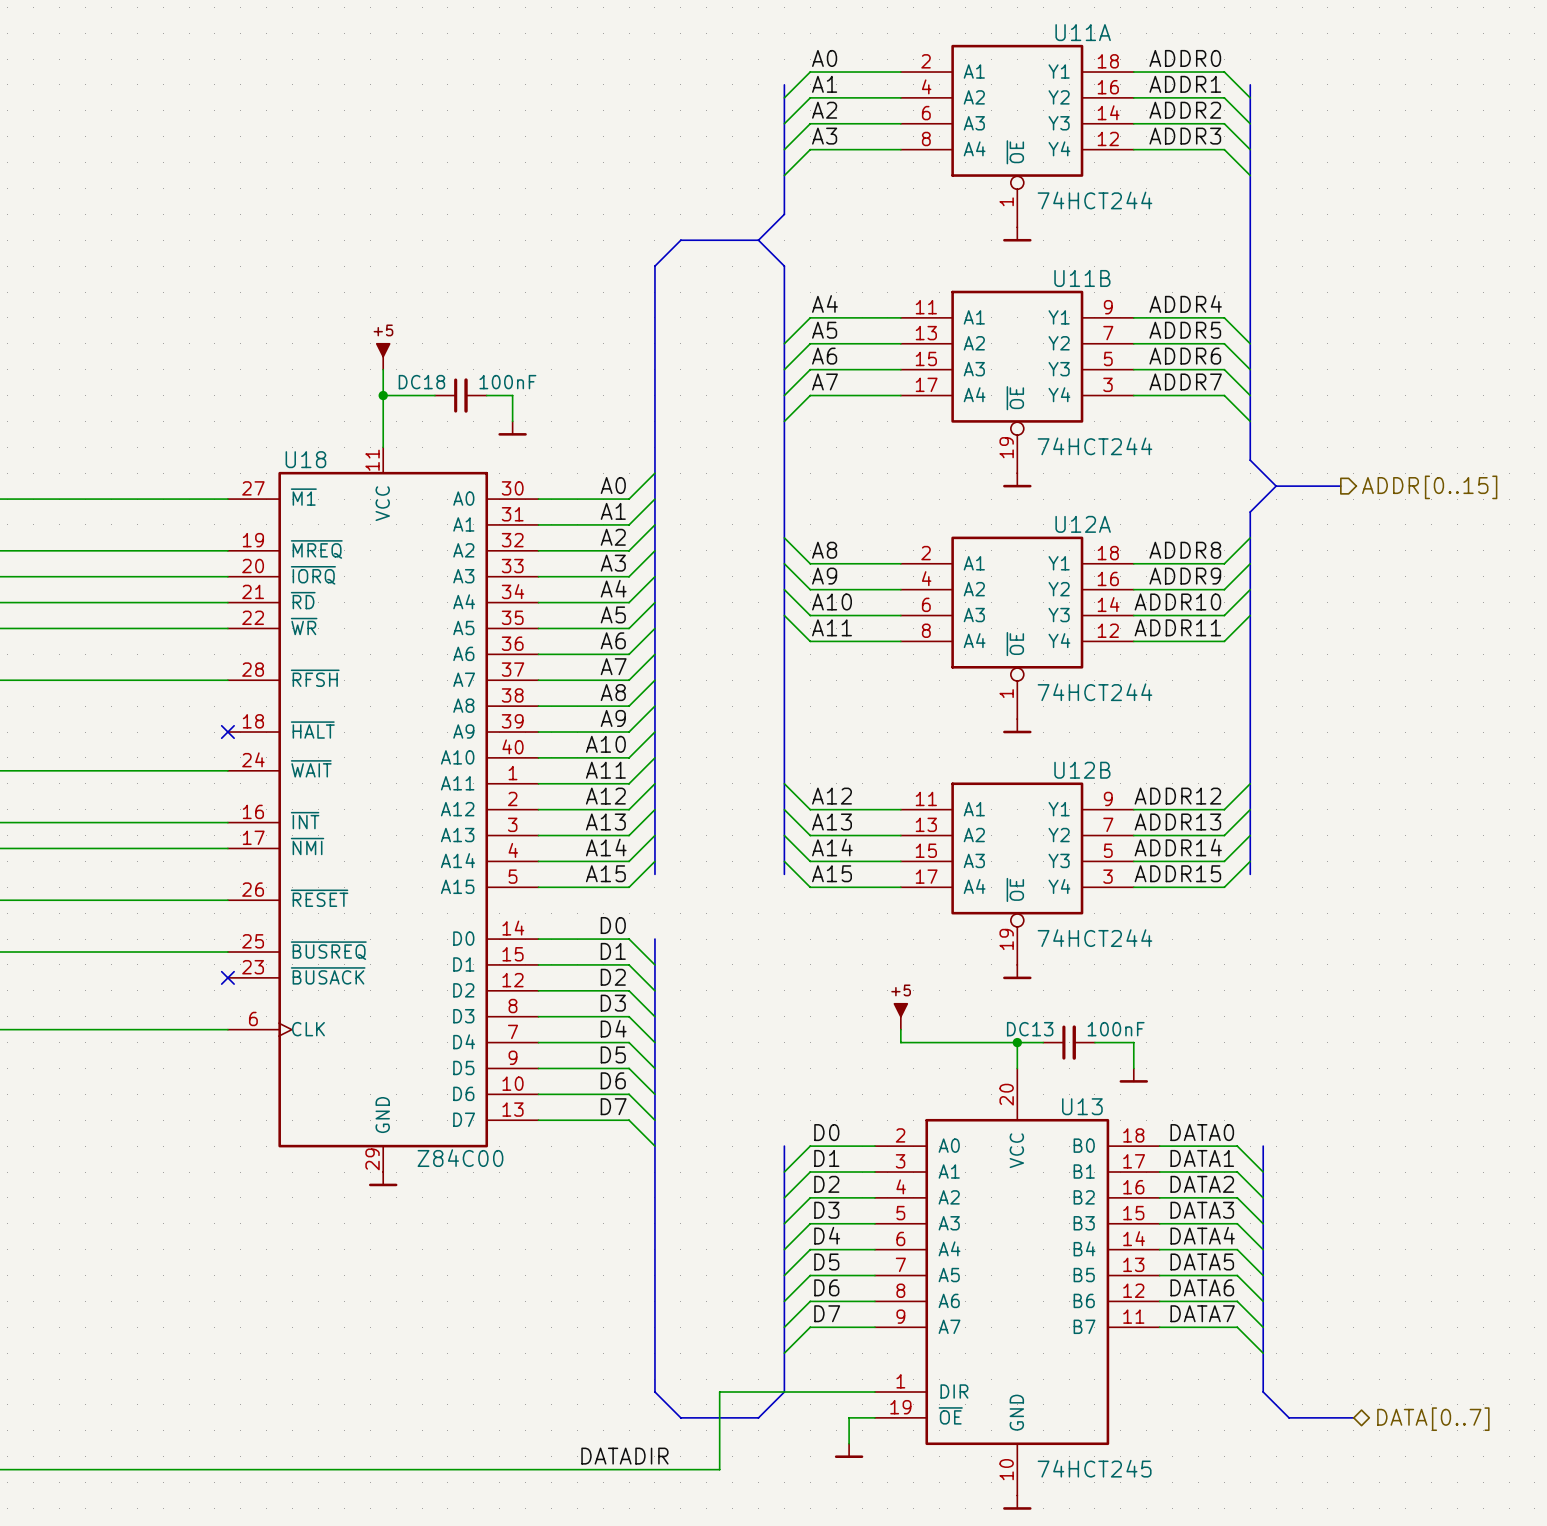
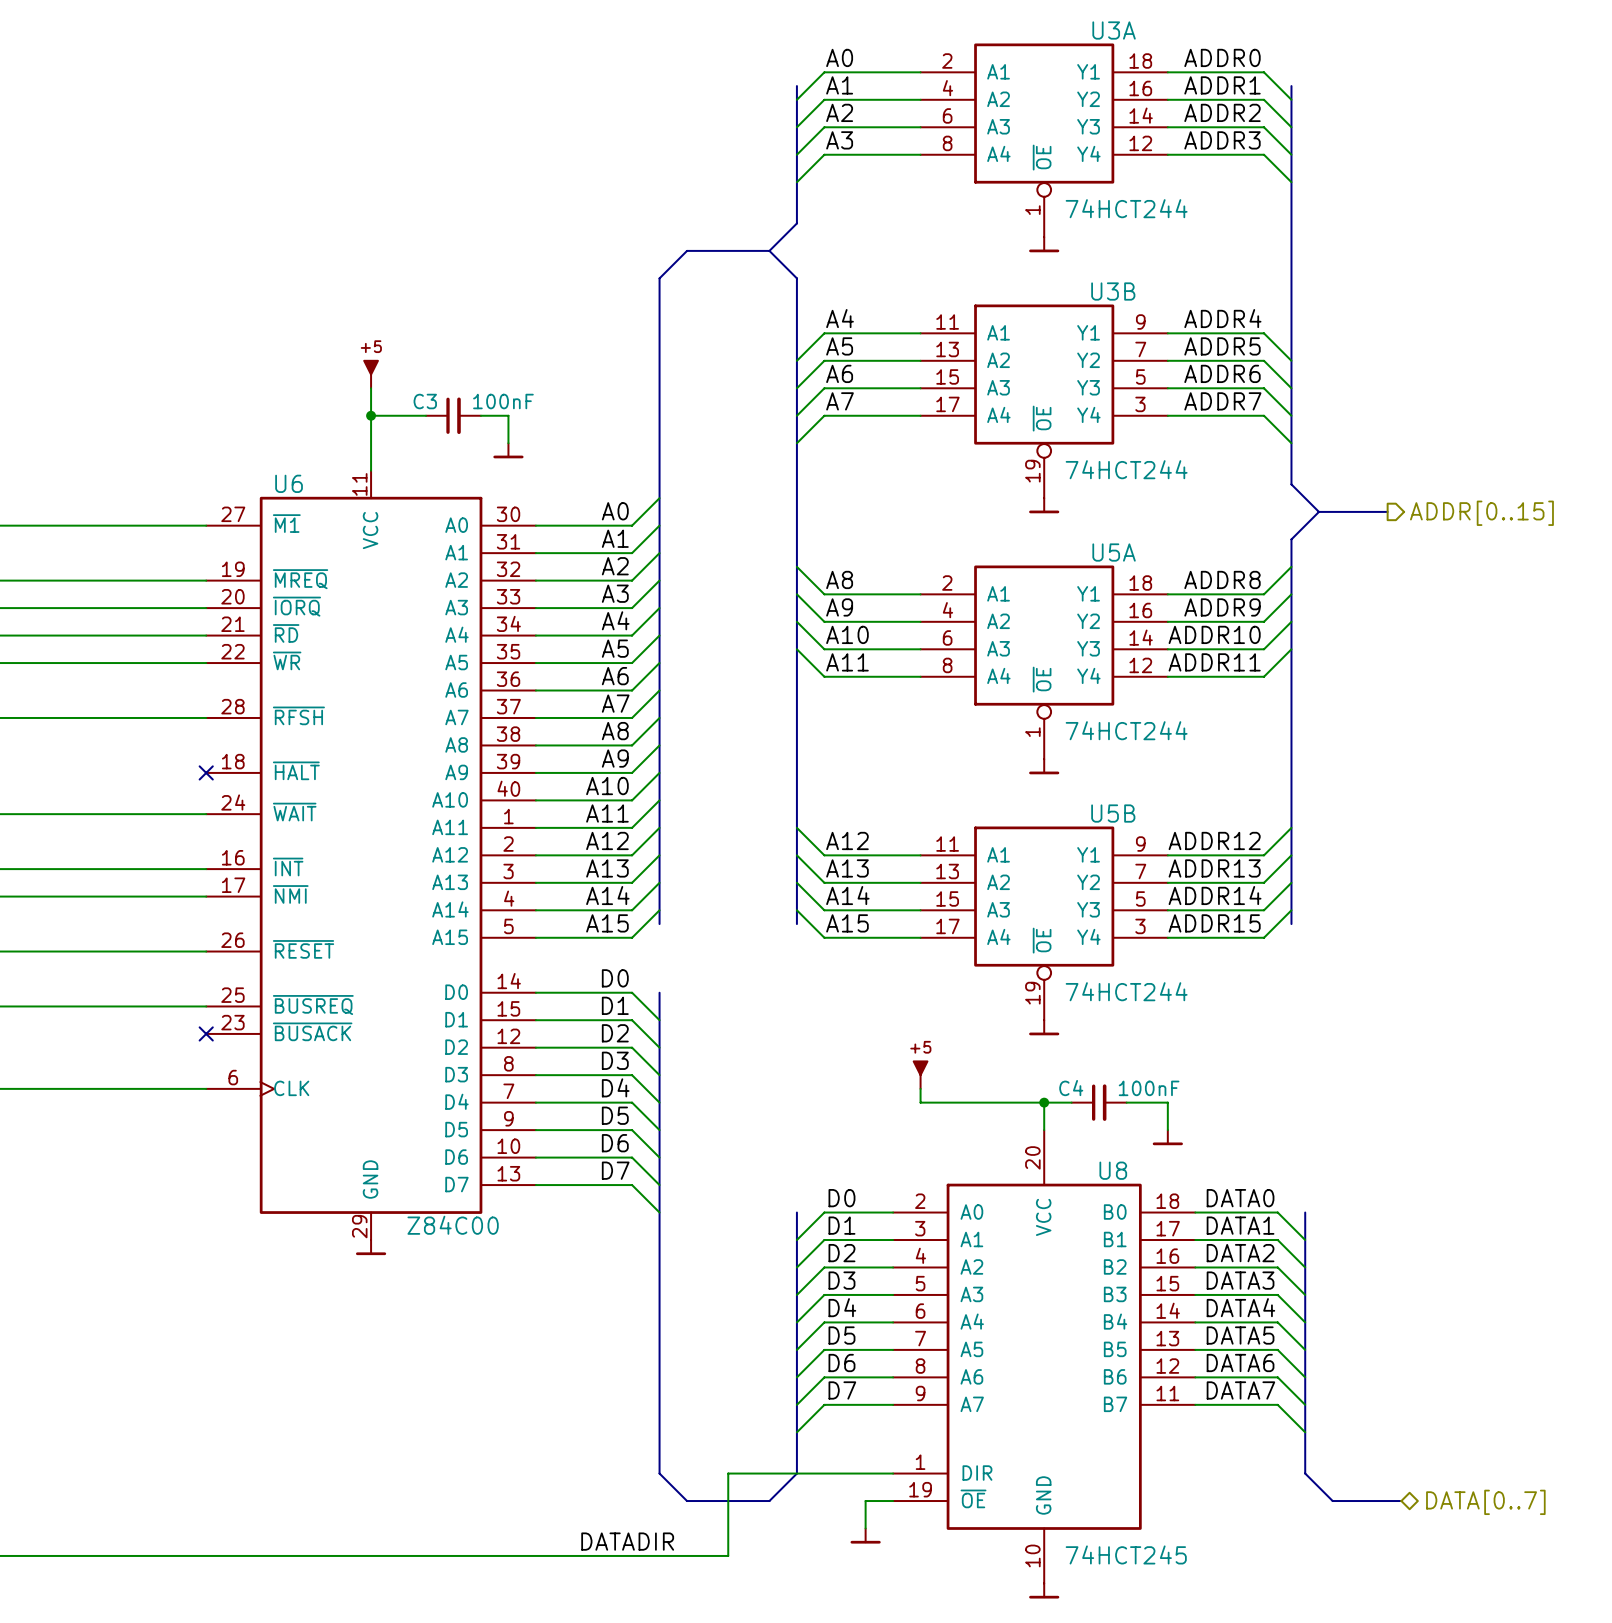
U11A name: U11A (1083, 32) -> U3A (1114, 30)
U11B name: U11B (1082, 278) -> U3B (1113, 291)
DC18 name: DC18 (421, 382) -> C3 (425, 401)
U18 name: U18 (305, 459) -> U6 (289, 483)
U12A name: U12A (1083, 524) -> U5A (1114, 552)
U12B name: U12B (1082, 770) -> U5B (1113, 813)
DC13 name: DC13 (1030, 1029) -> C4 (1071, 1088)
U13 name: U13 (1082, 1106) -> U8 (1113, 1170)

